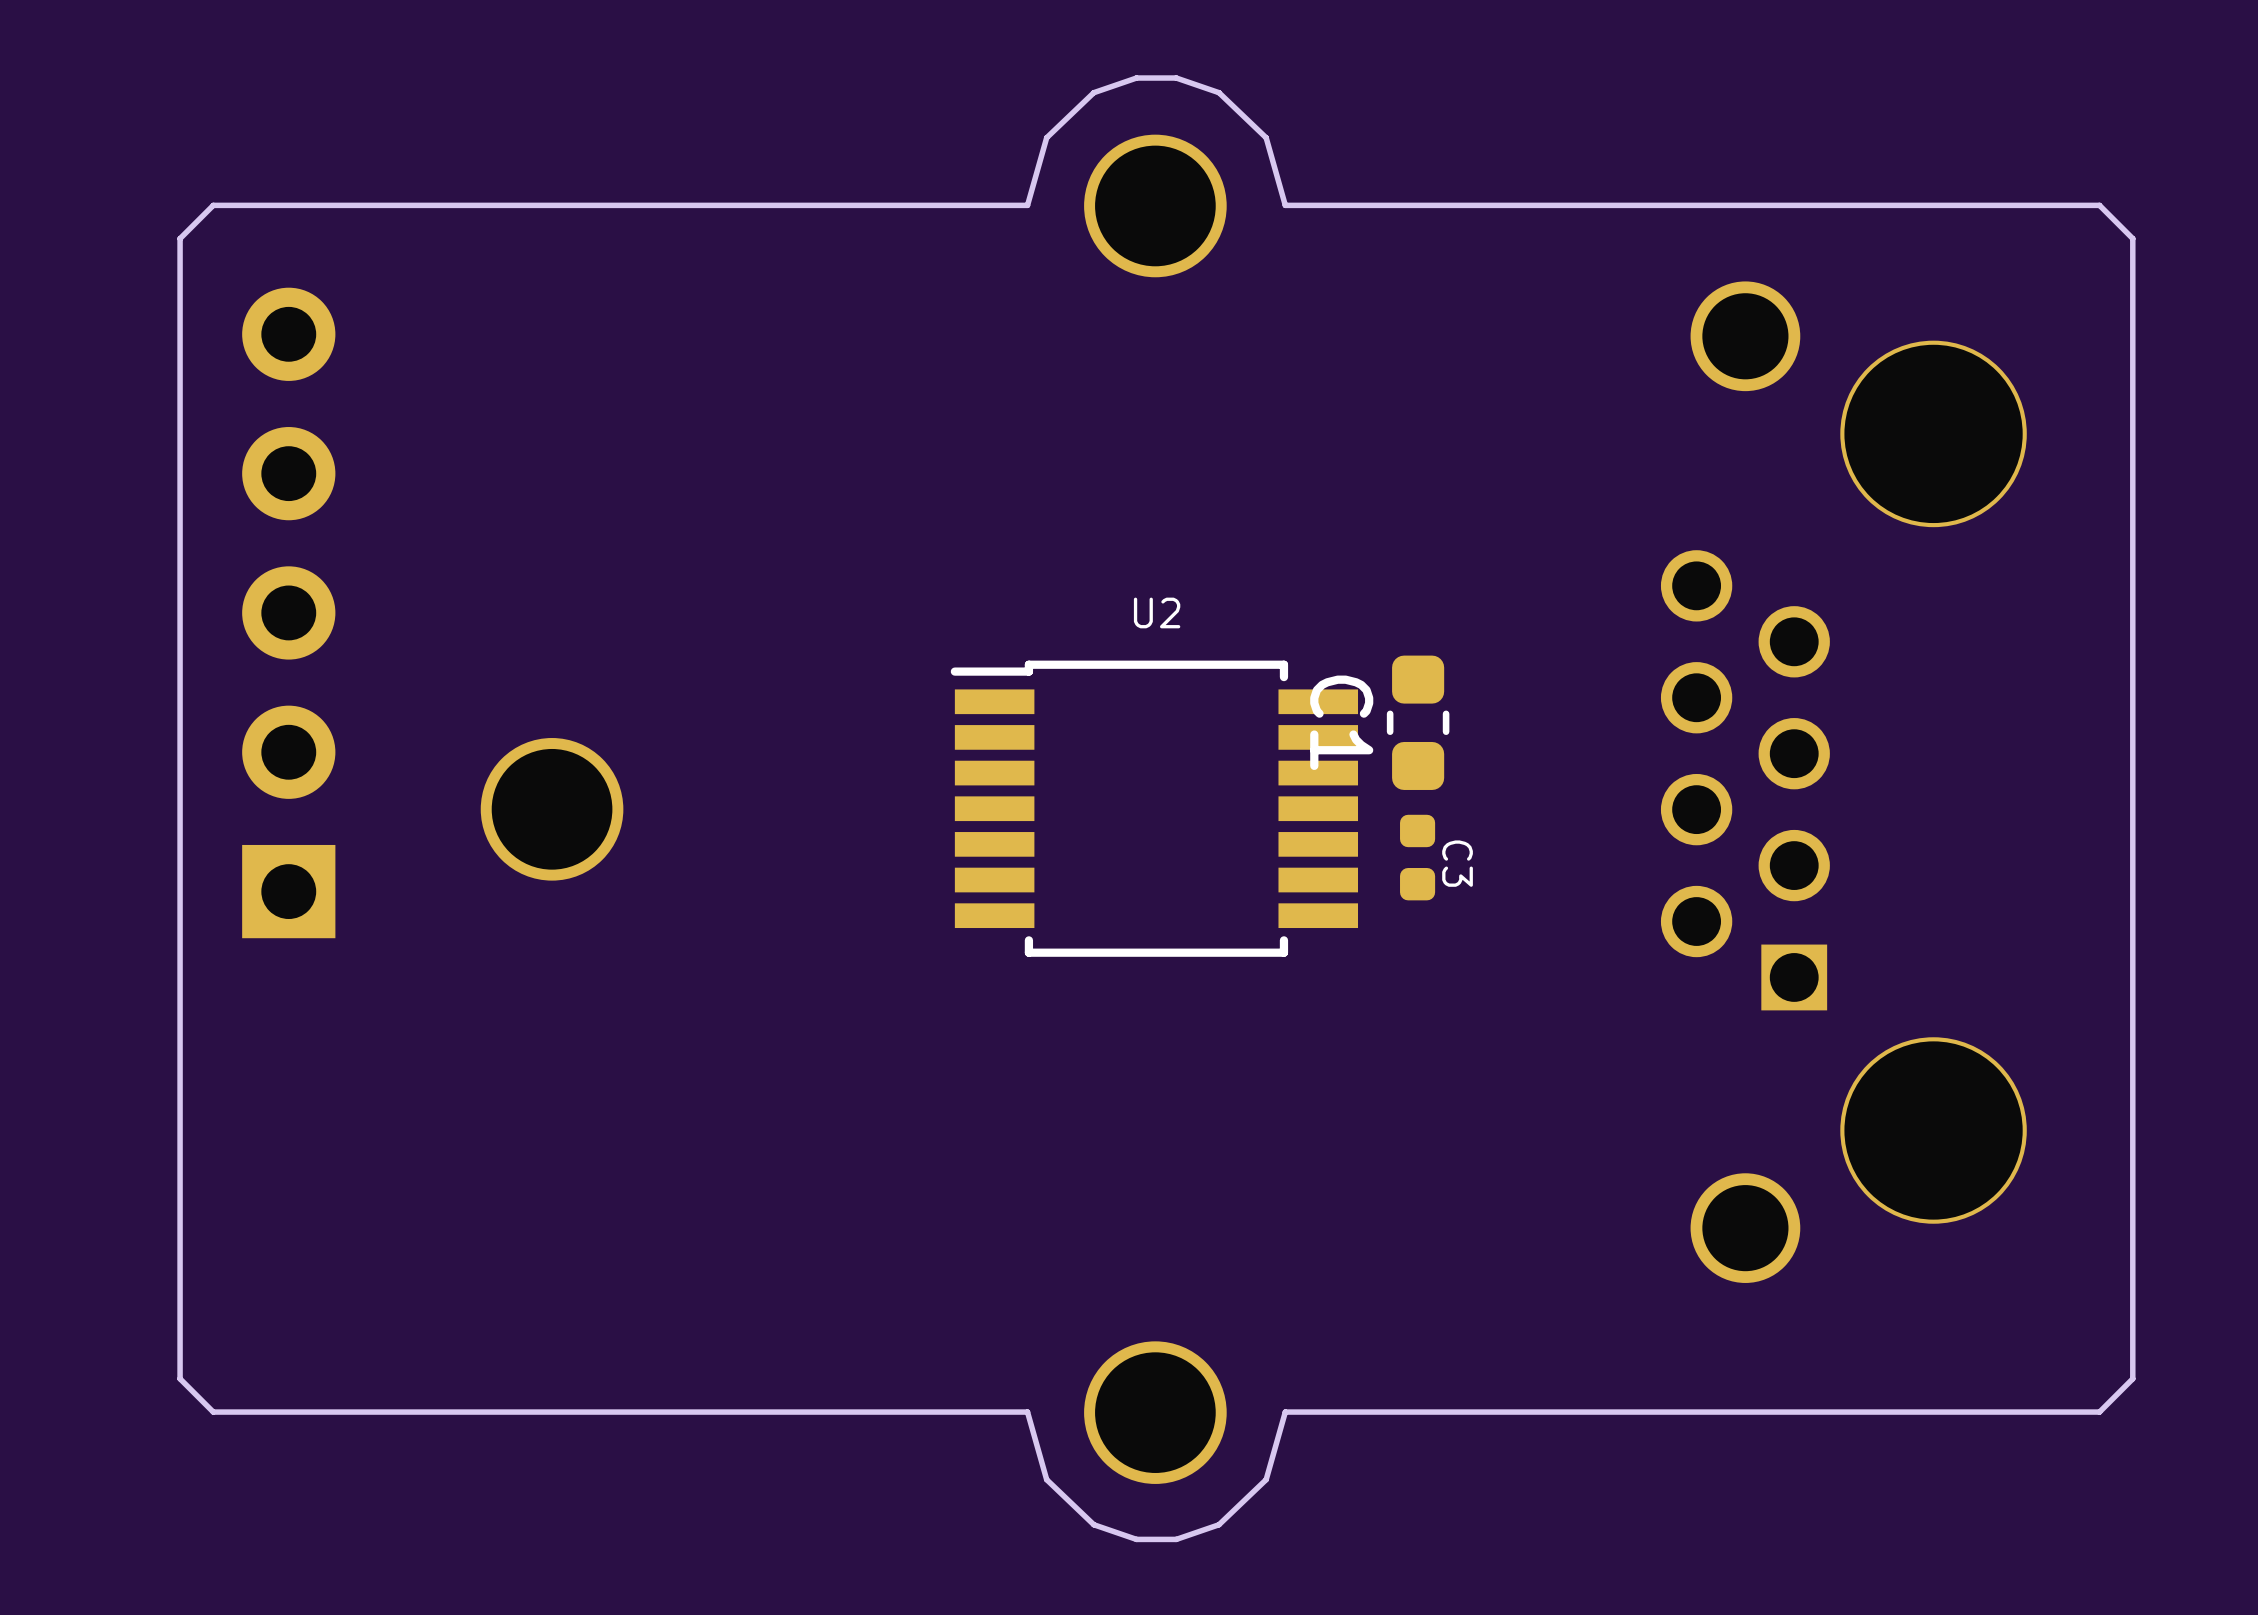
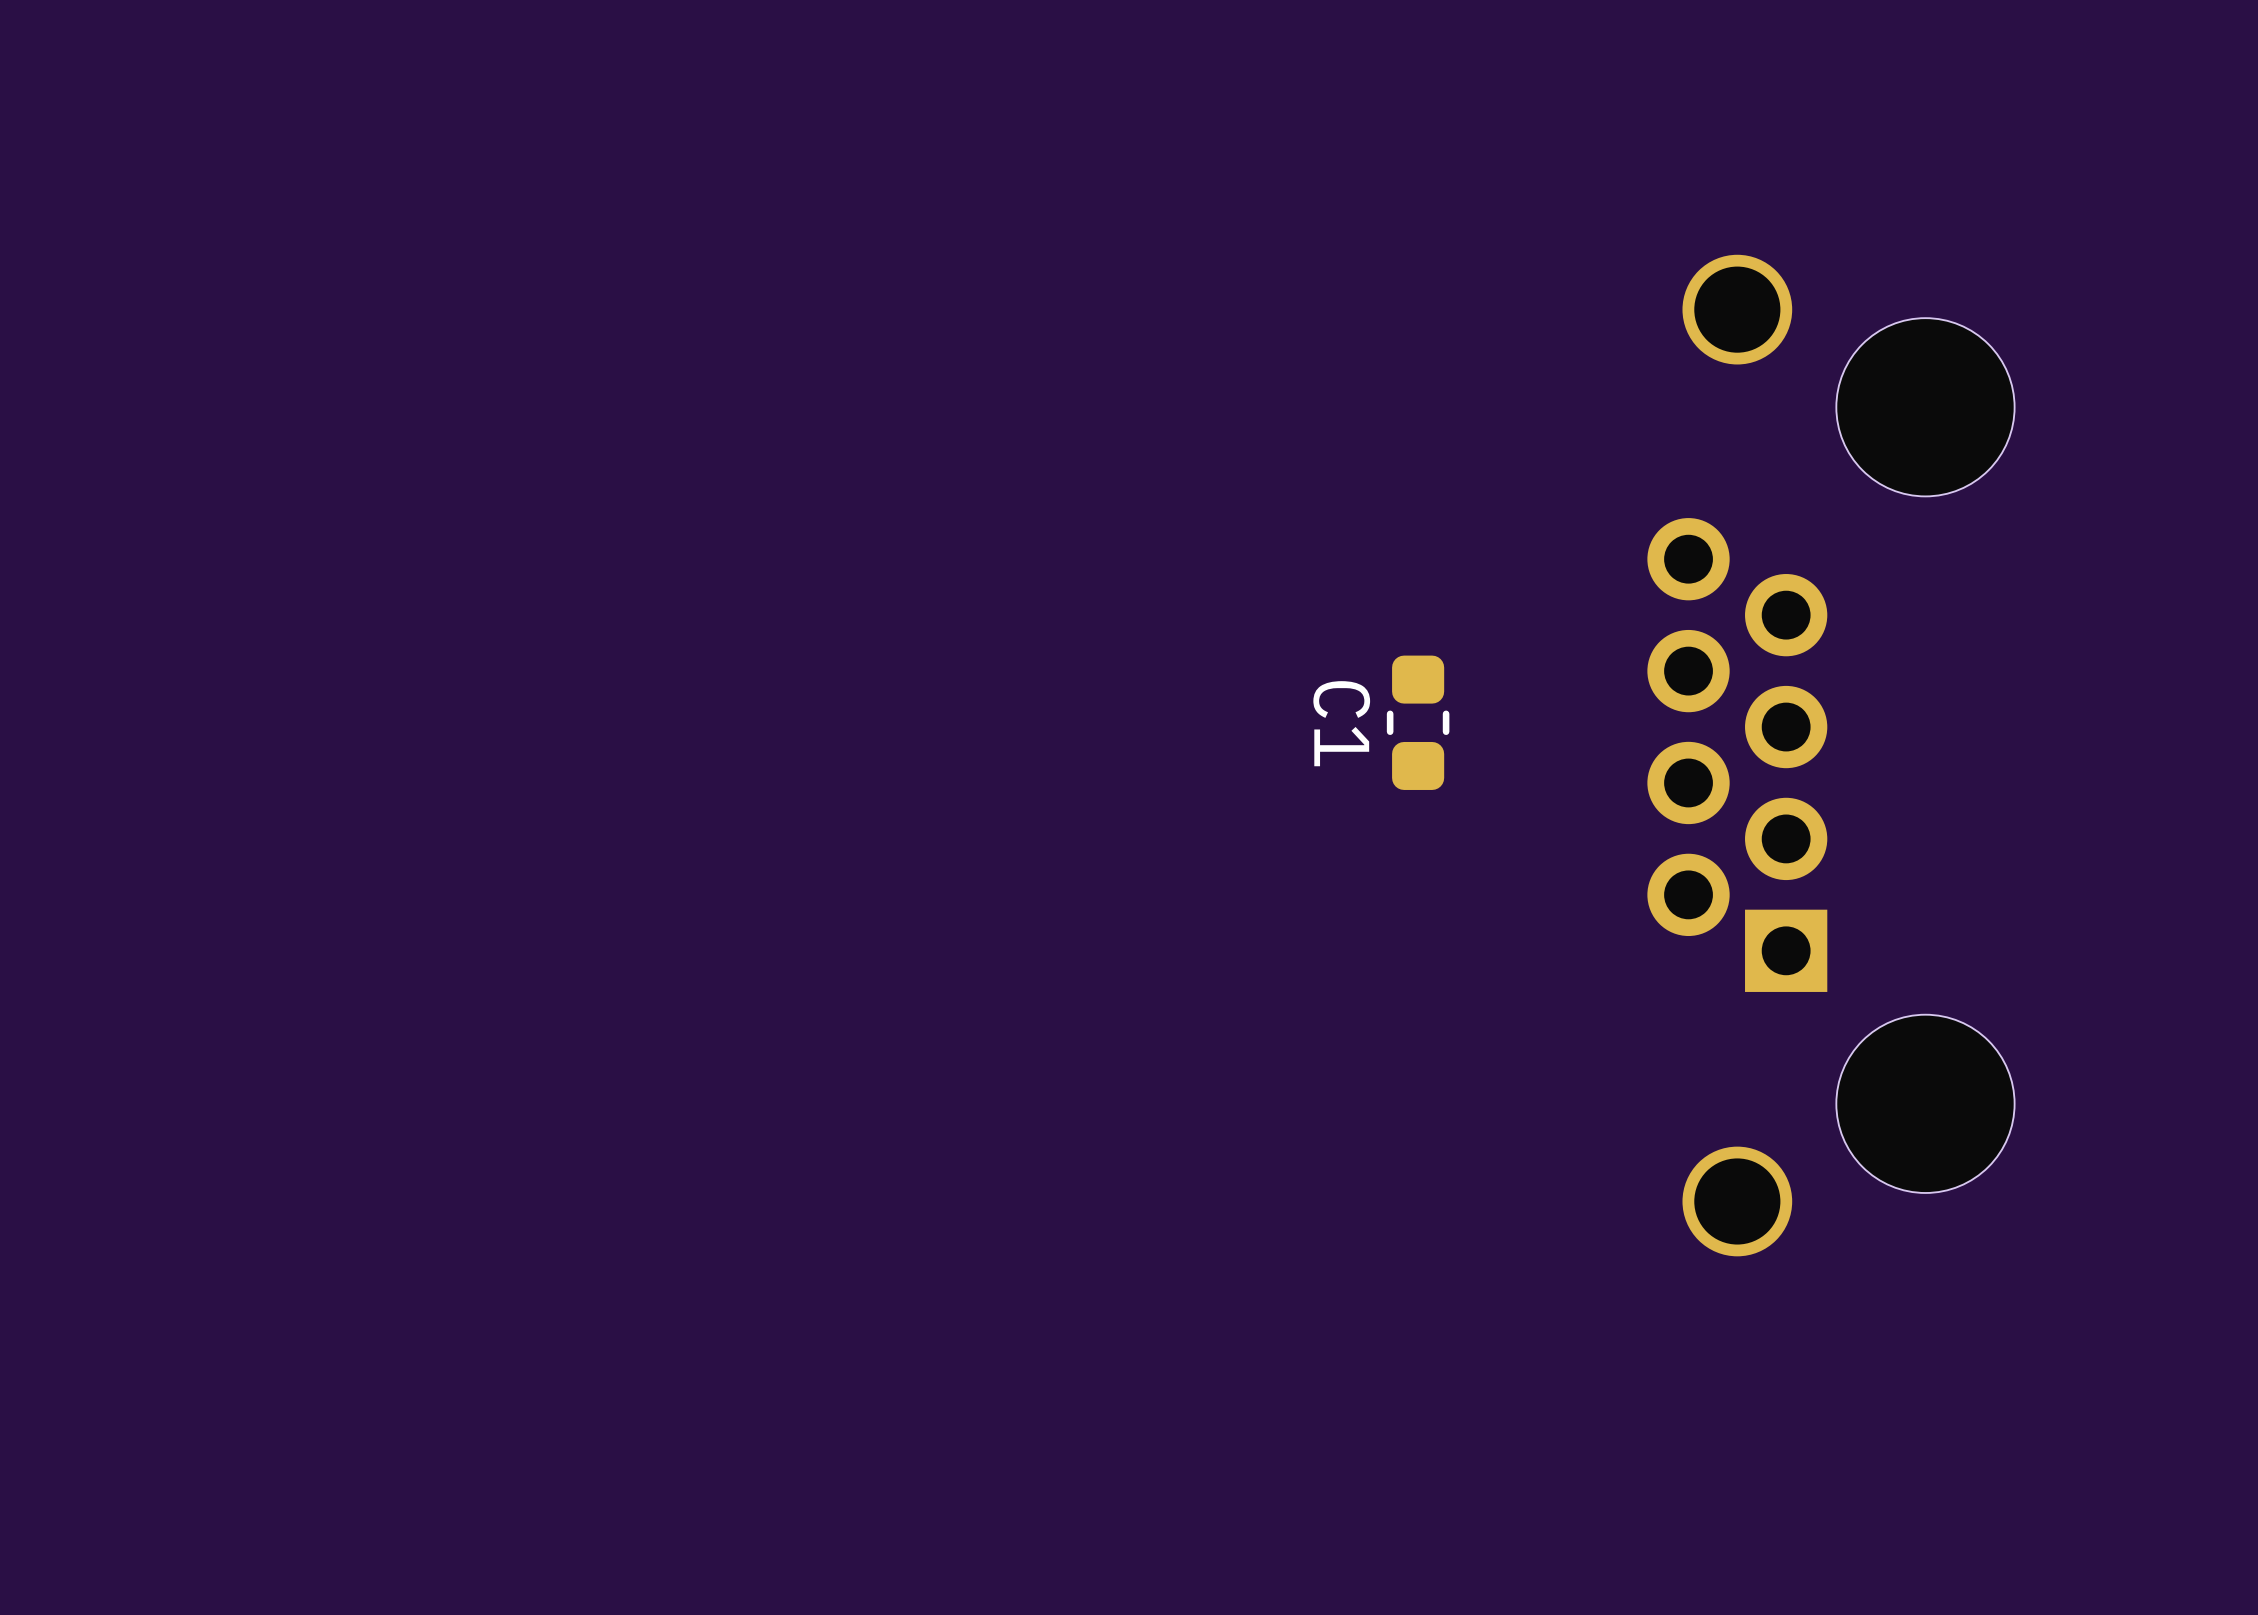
board edge: (1176, 78) (1218, 92) (1266, 137) (1285, 205) (2099, 205) (2132, 238) (2132, 1378) (2099, 1412) (1285, 1412) (1266, 1479) (1218, 1524) (1176, 1539) (1136, 1539) (1093, 1524) (1046, 1479) (1027, 1412) (213, 1412) (180, 1378) (180, 238) (213, 205) (1027, 205) (1046, 137) (1093, 92) (1136, 78) (1176, 78) -> none
part: (1155, 205) -> none
part footprint: [1660, 281, 2027, 1283] -> [1647, 254, 2015, 1257]
part: (288, 612) -> none
U2: (1154, 808) -> none
part: (552, 809) -> none
C3: (1417, 857) -> none
part: (1155, 1412) -> none

